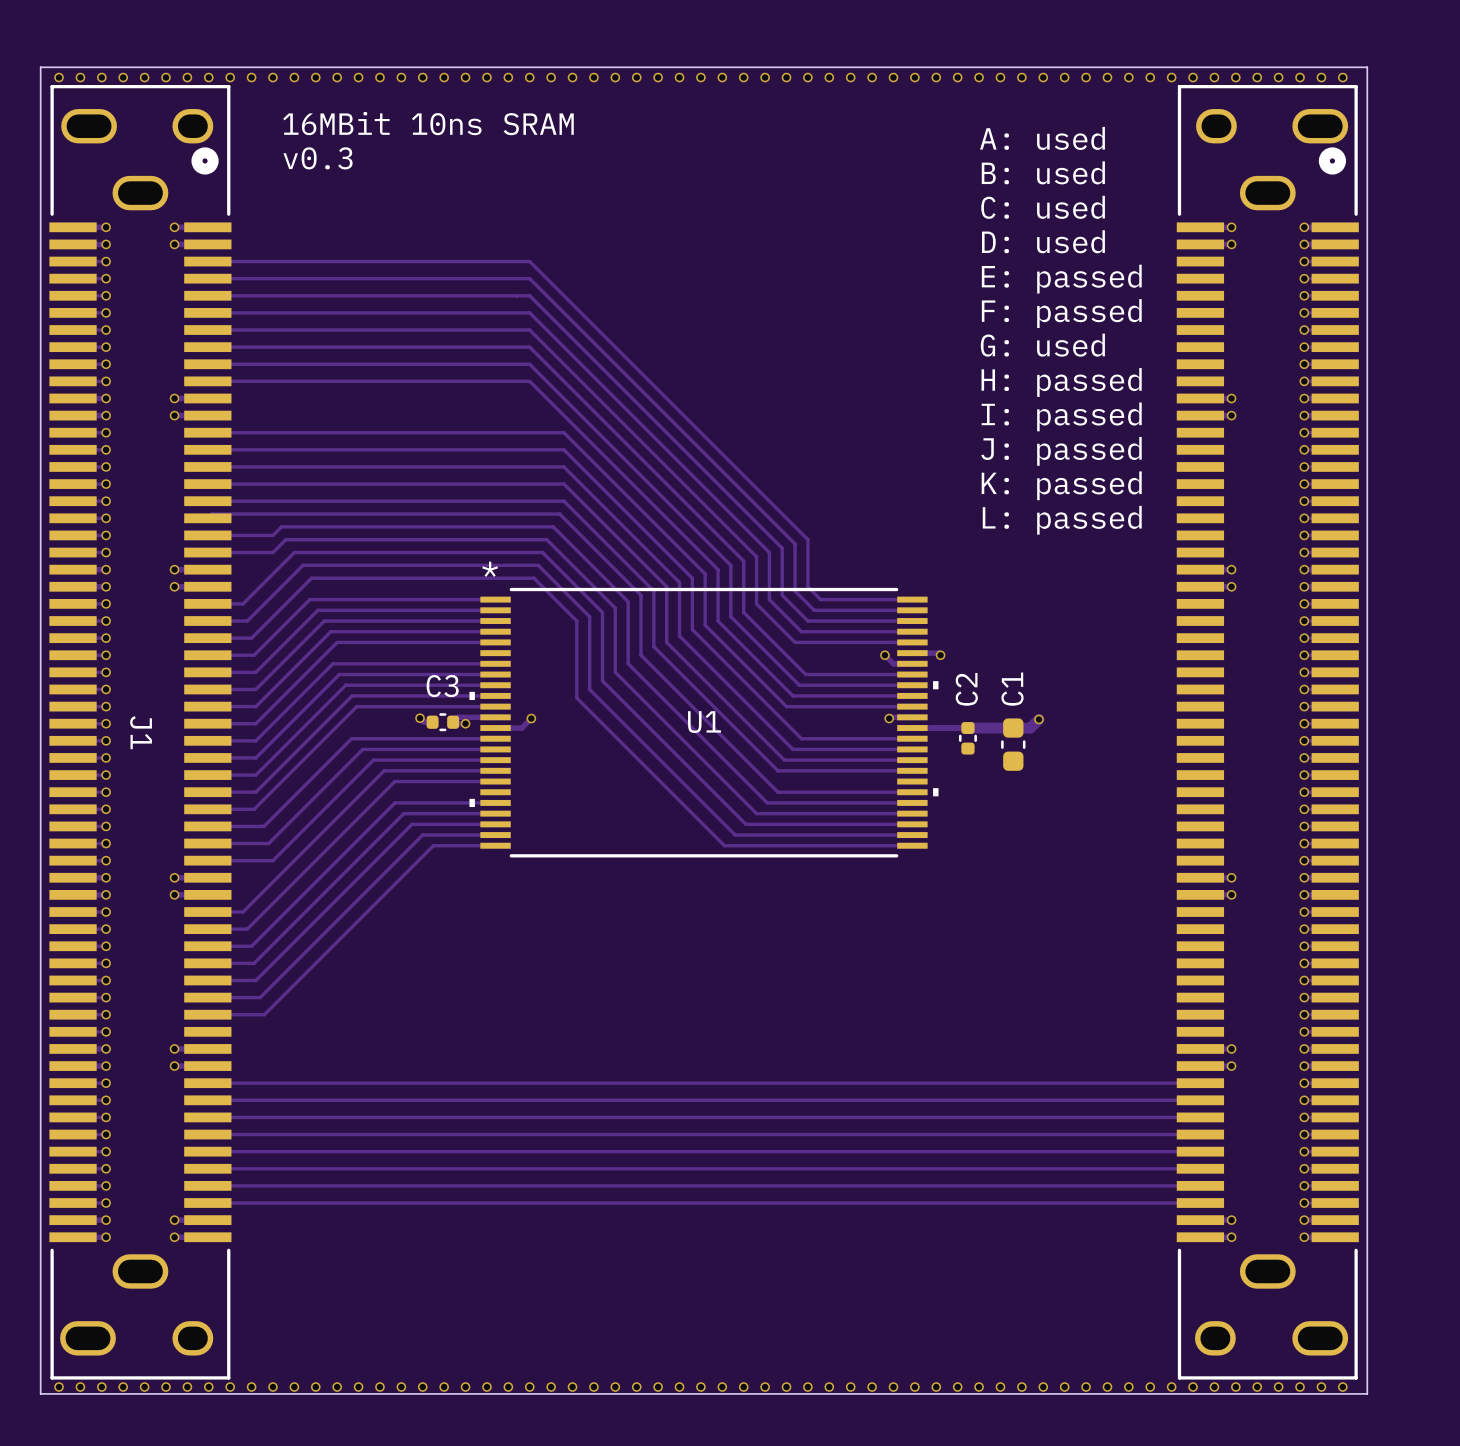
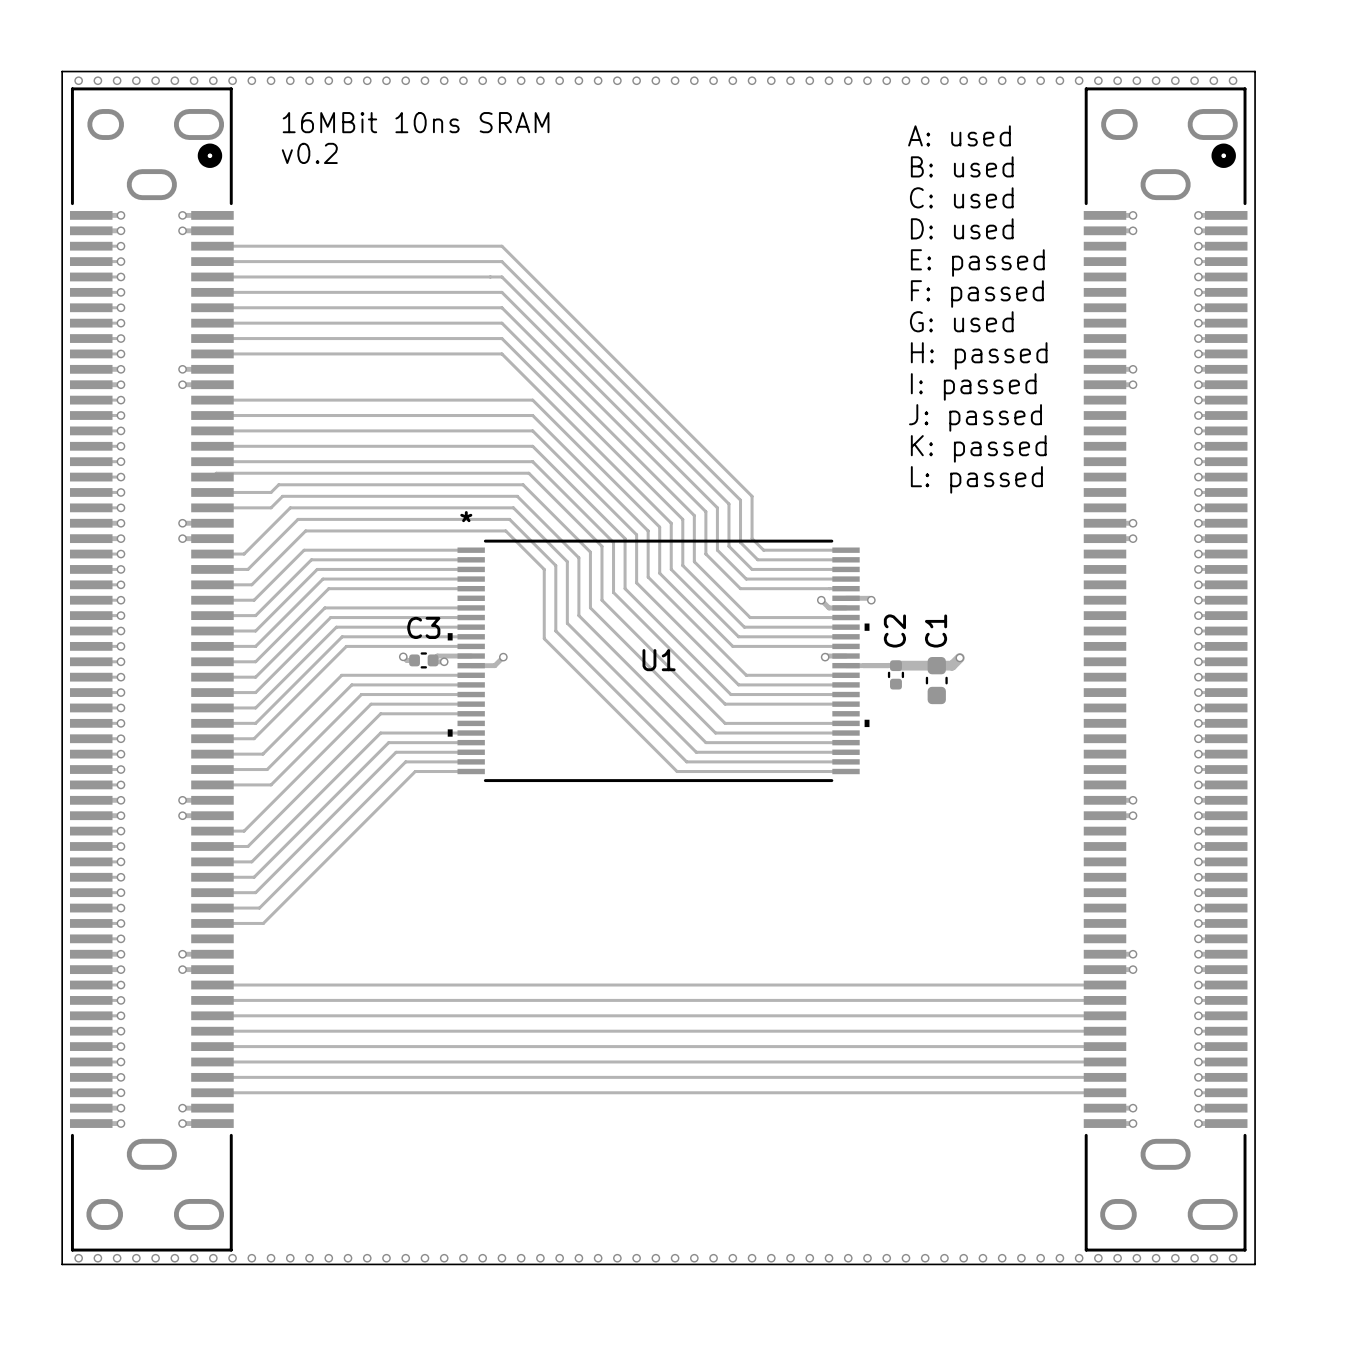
text: v0.3 (318, 158) -> v0.2 (309, 153)
J1: (140, 732) -> none
part: none -> (151, 669)

